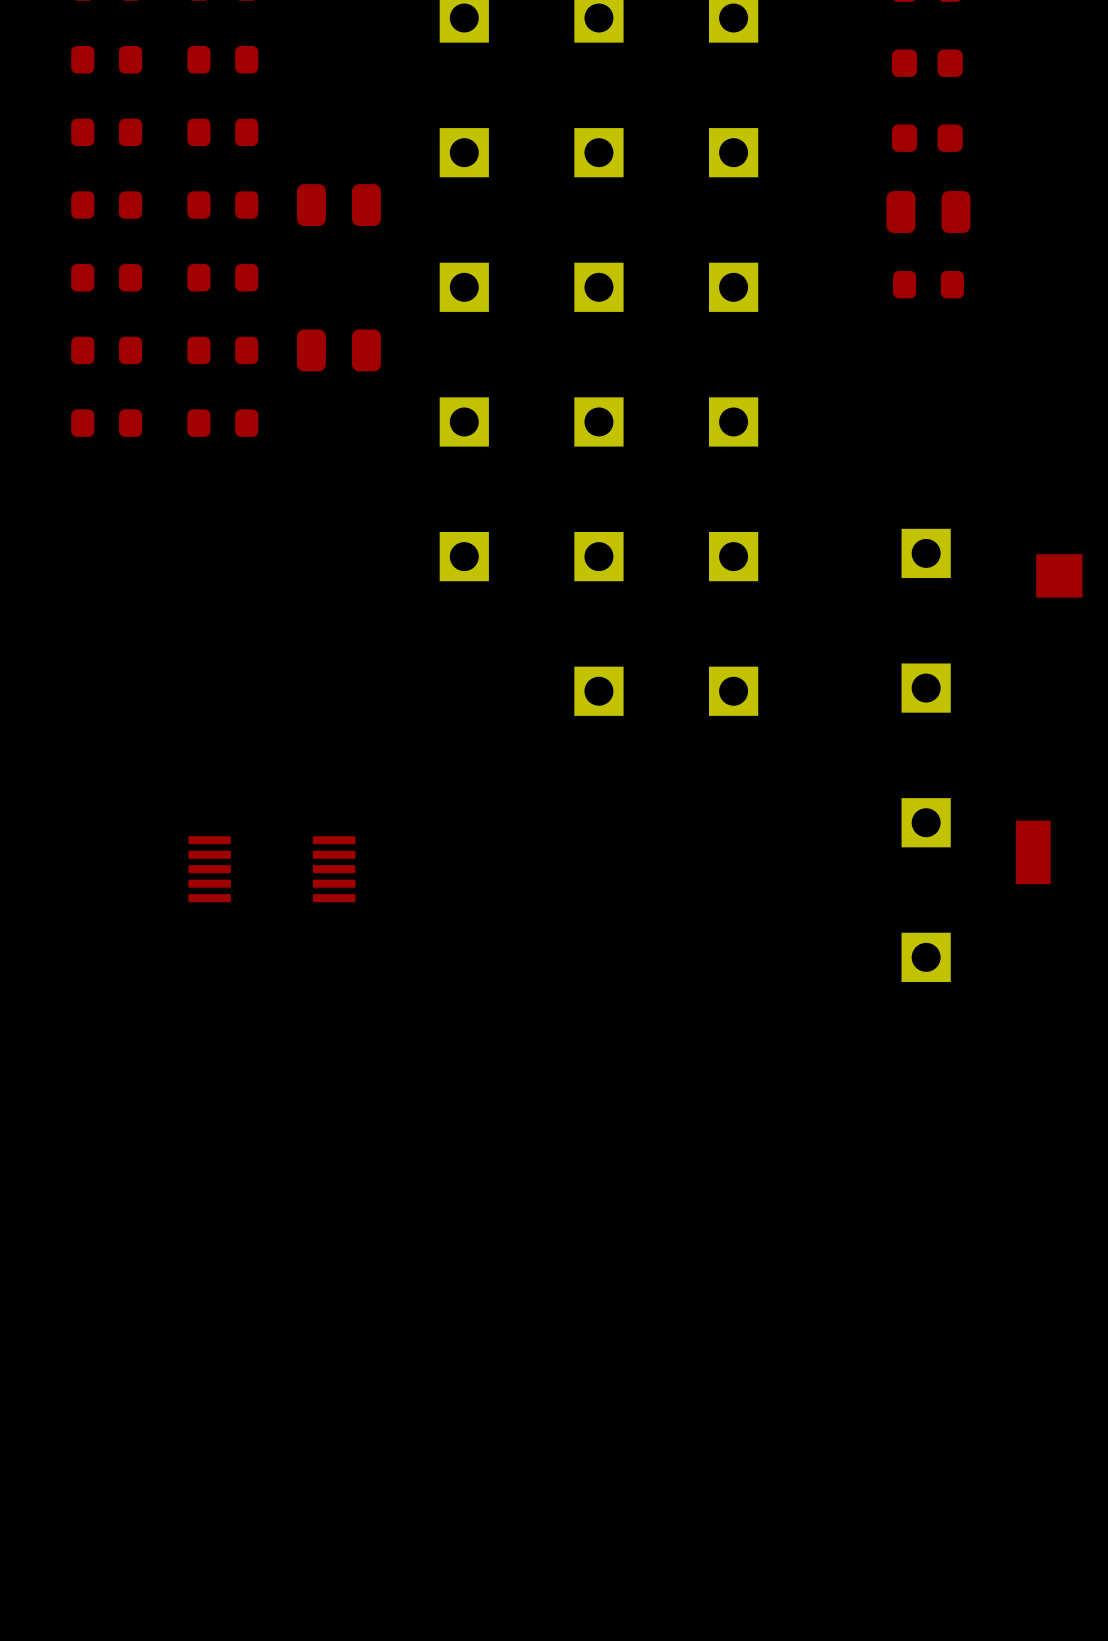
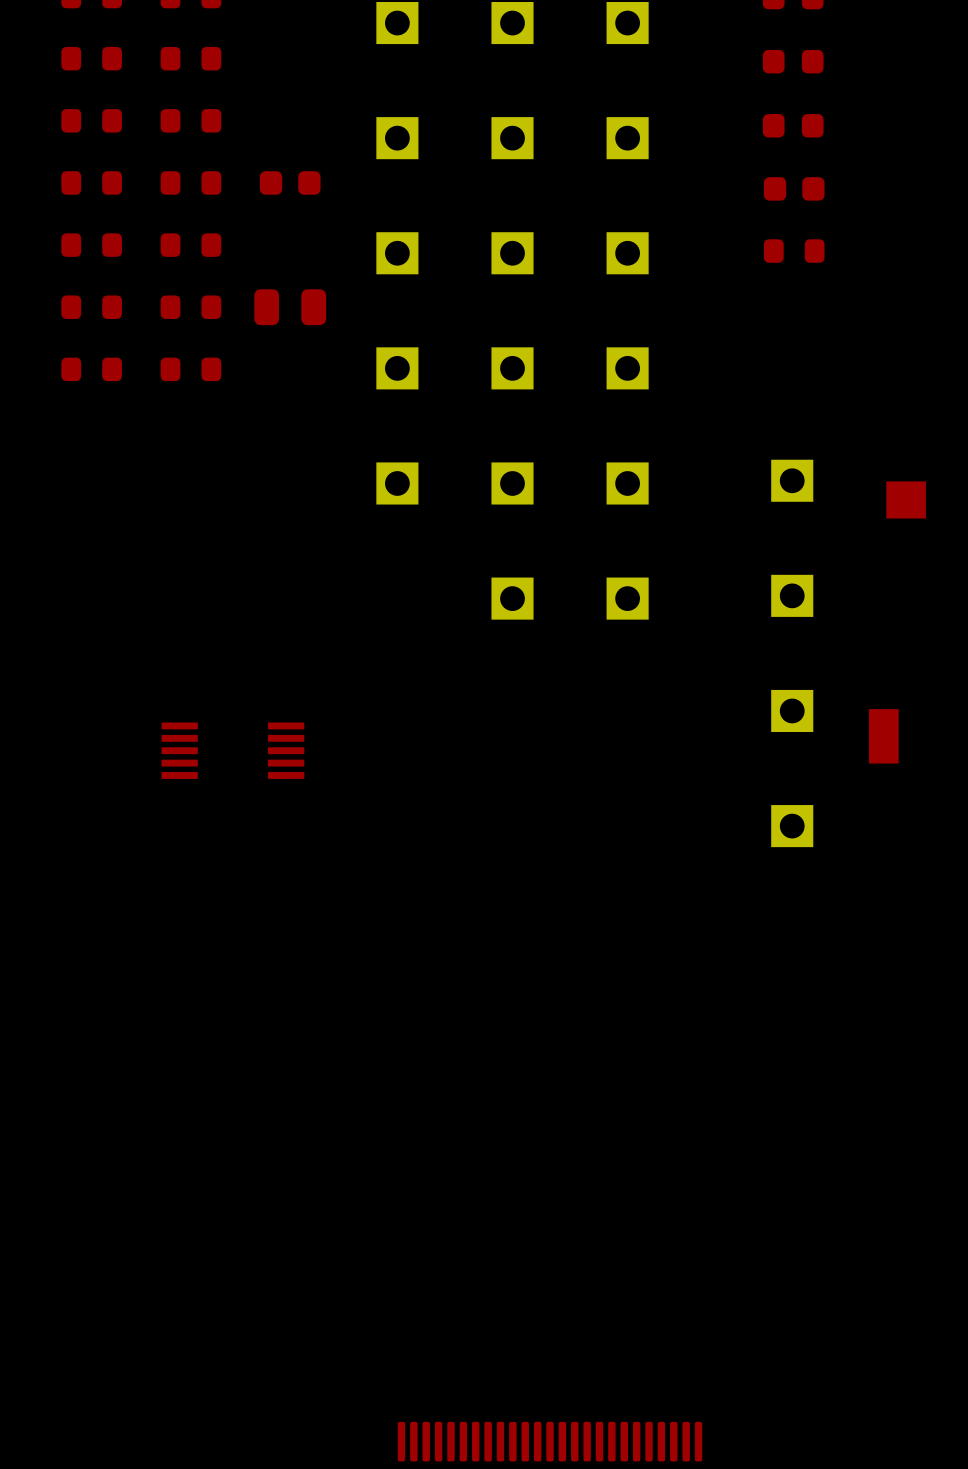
part footprint: [296, 184, 381, 227] -> [259, 171, 321, 195]
part footprint: [886, 191, 971, 234] -> [763, 177, 825, 201]

